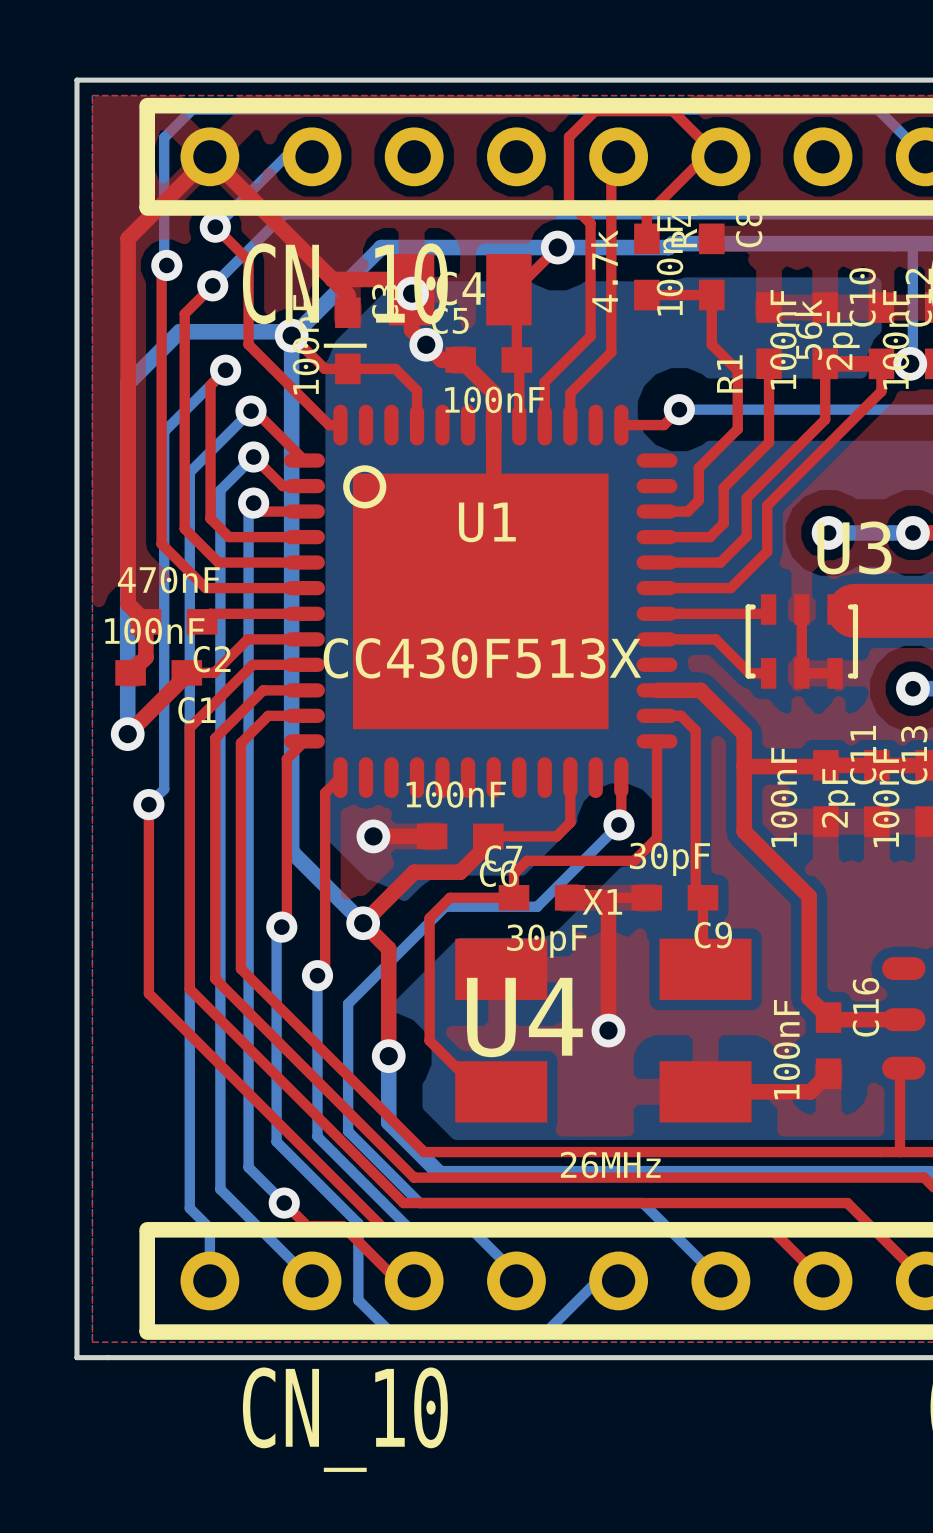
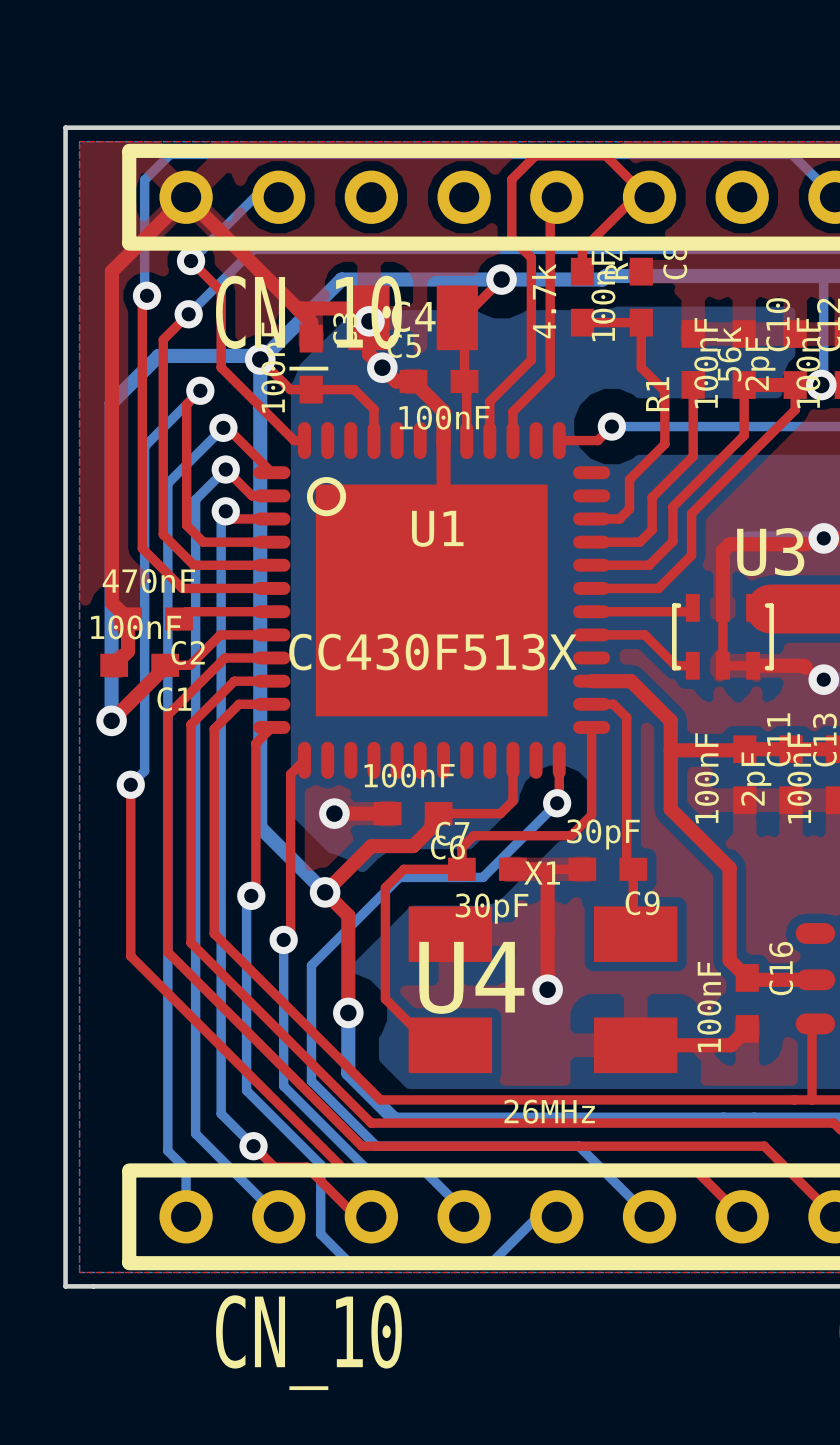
via: (828, 532) -> none
top track: none -> (806, 544) (729, 544) (722, 550) (722, 607)
top track: none -> (753, 665) (804, 665) (806, 667)

